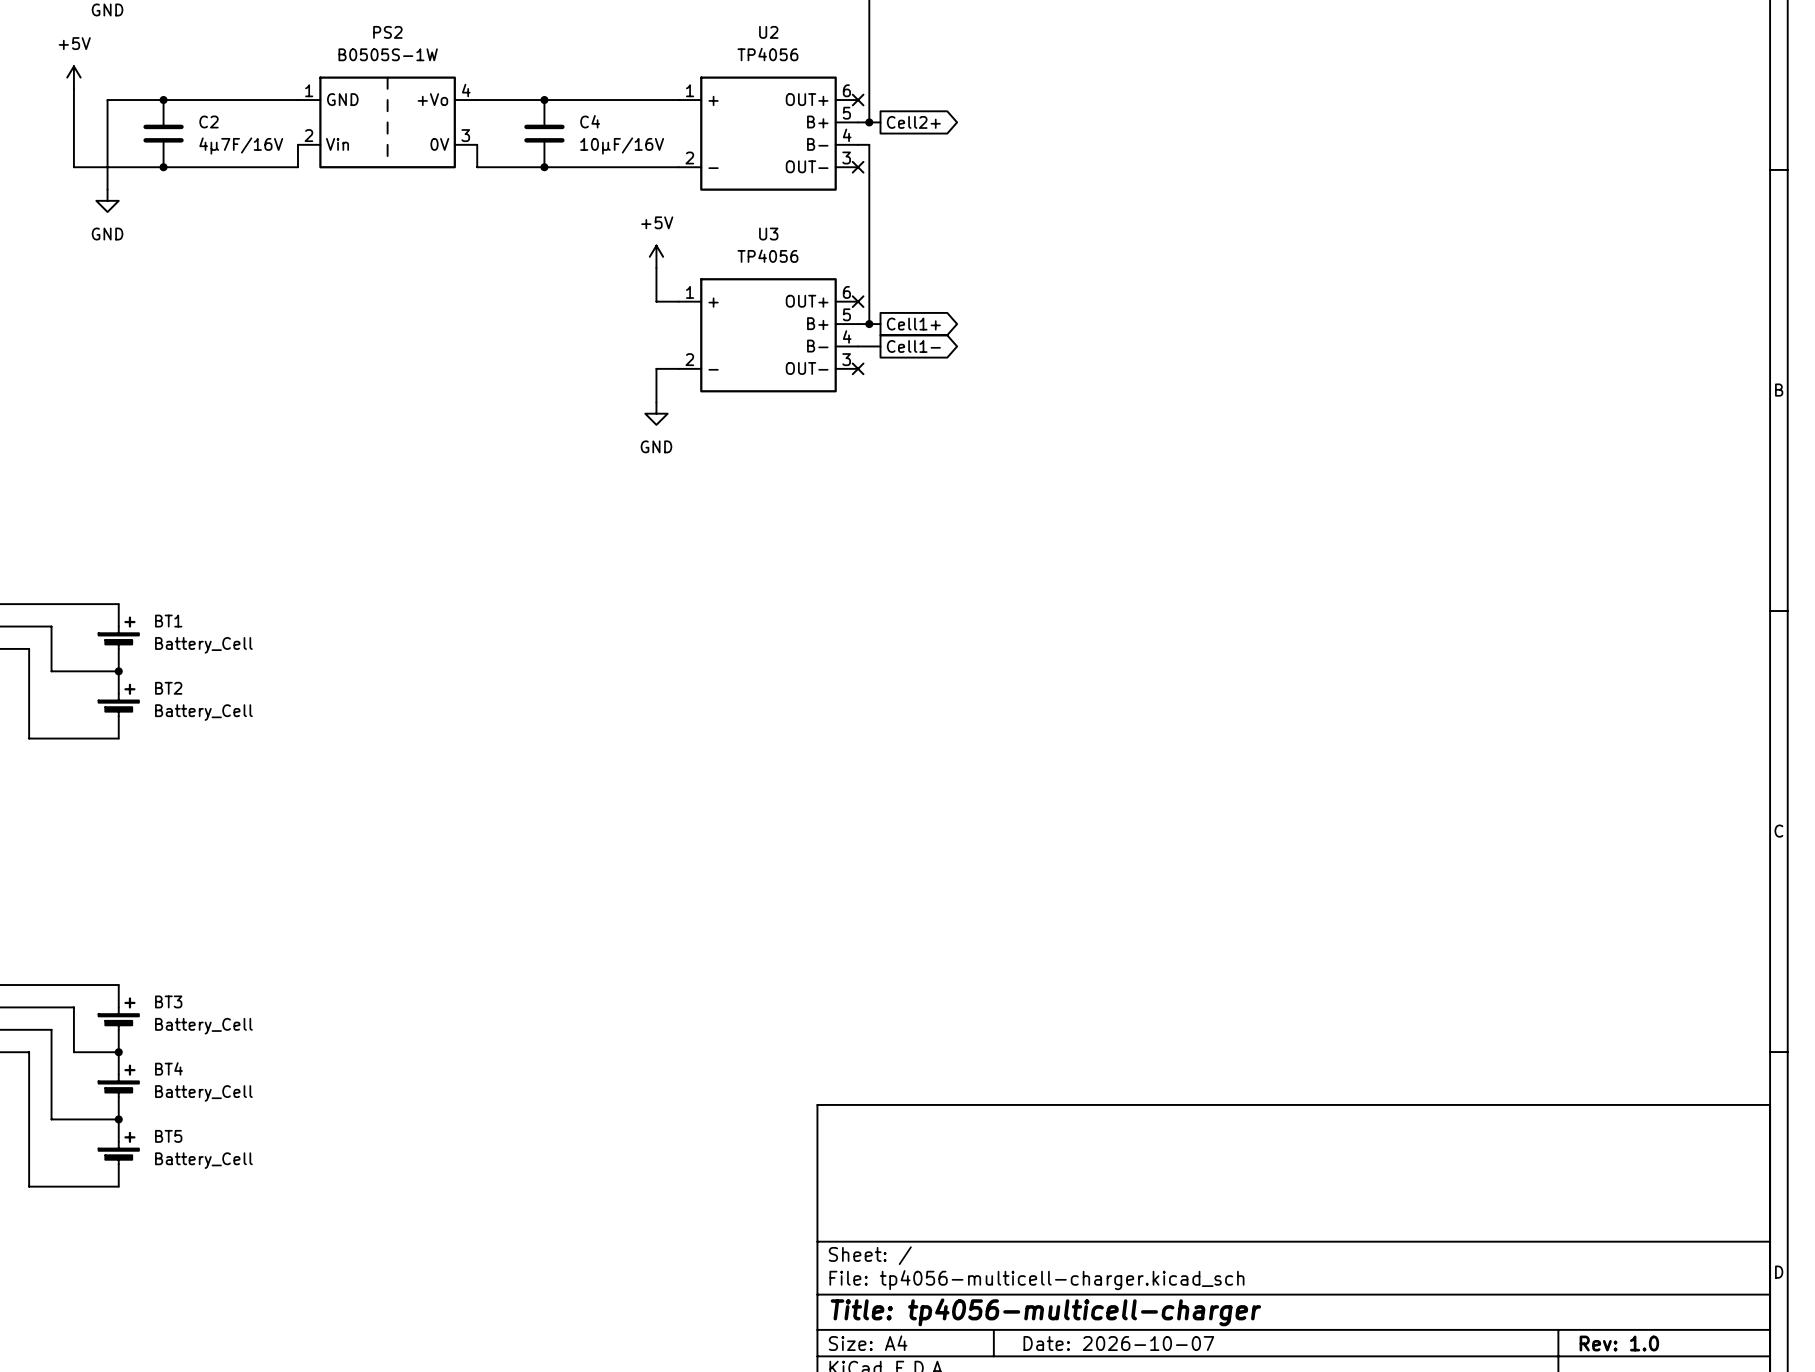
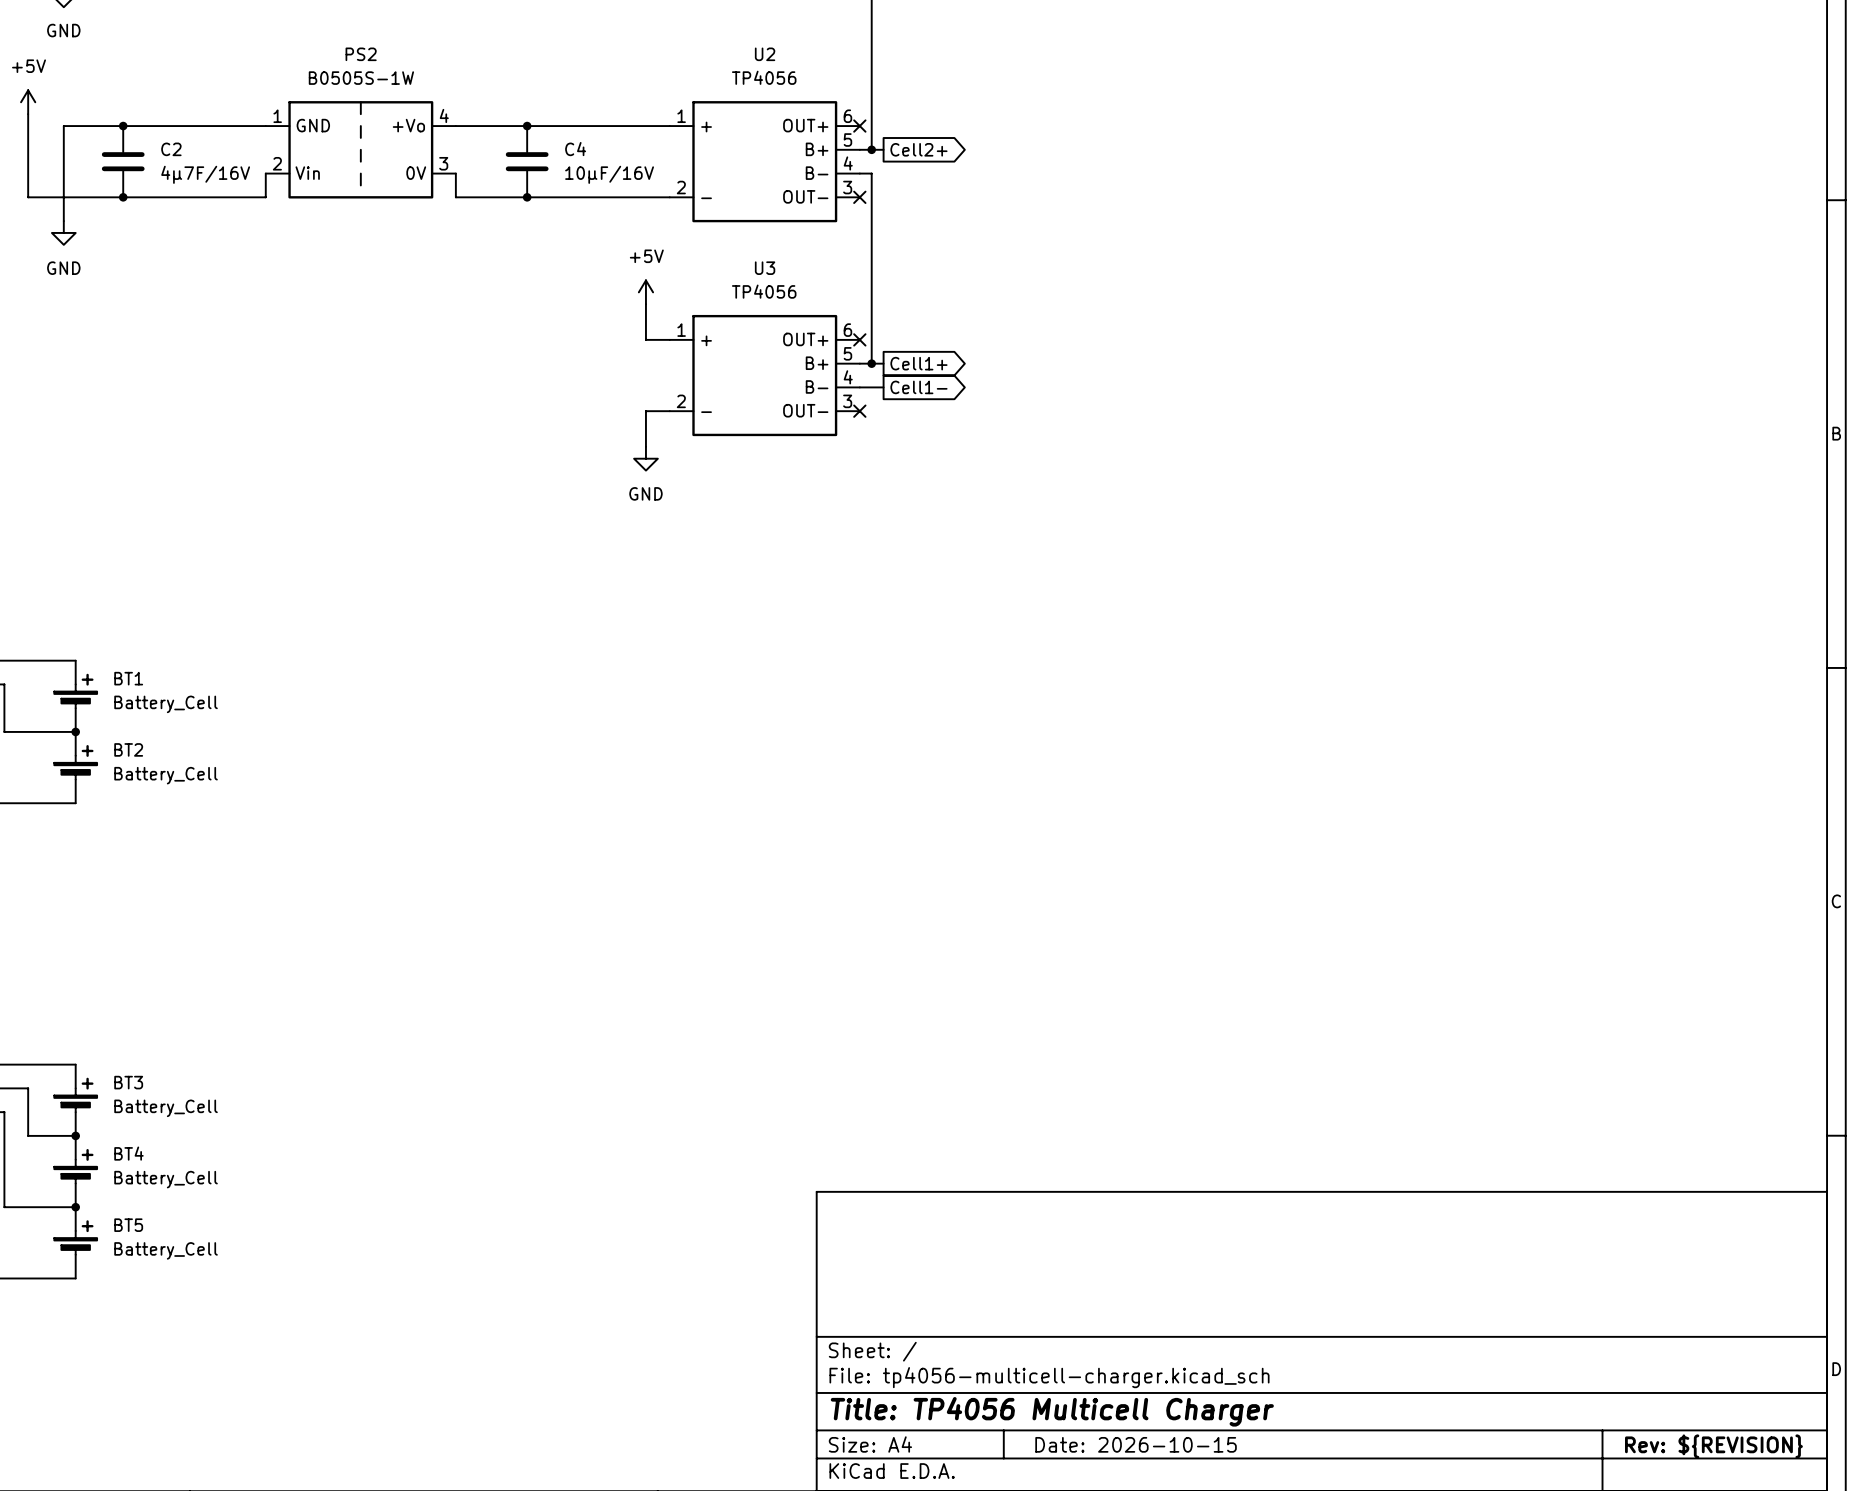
title block: Title: tp4056-multicell-charger (1045, 1312) -> Title: TP4056 Multicell Charger (1052, 1411)
title block: Date: 2026-10-07 (1118, 1343) -> Date: 2026-10-15 (1136, 1444)
title block: Rev: 1.0 (1619, 1343) -> Rev: ${REVISION} (1713, 1446)

